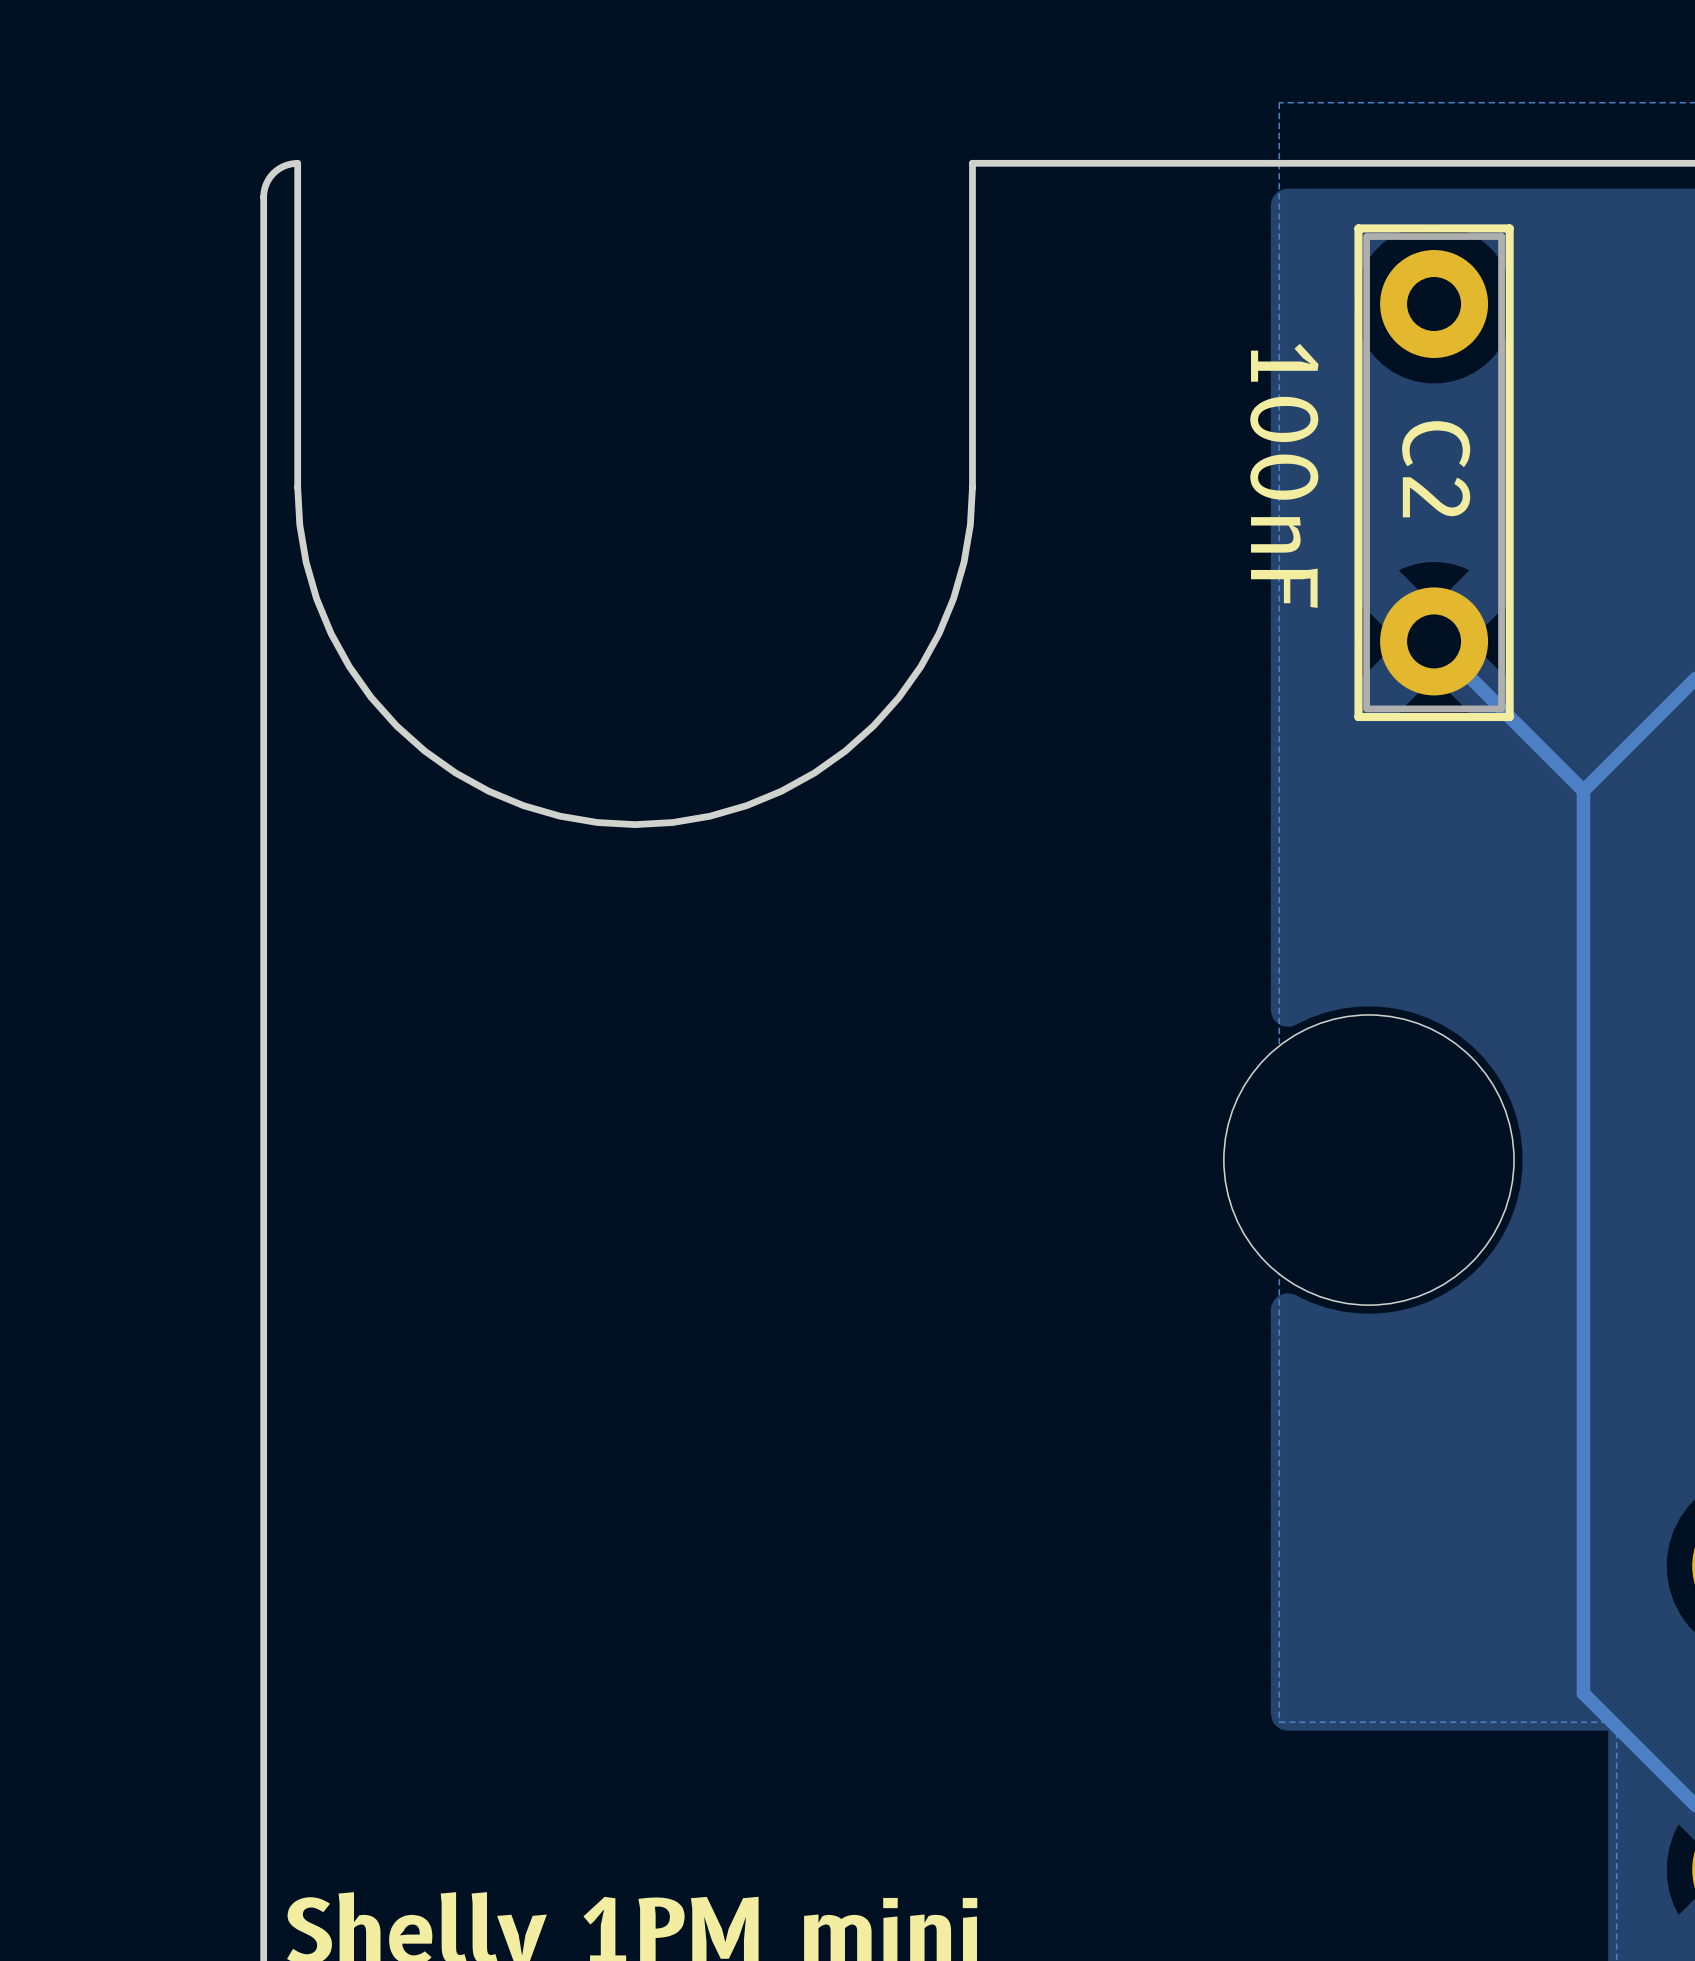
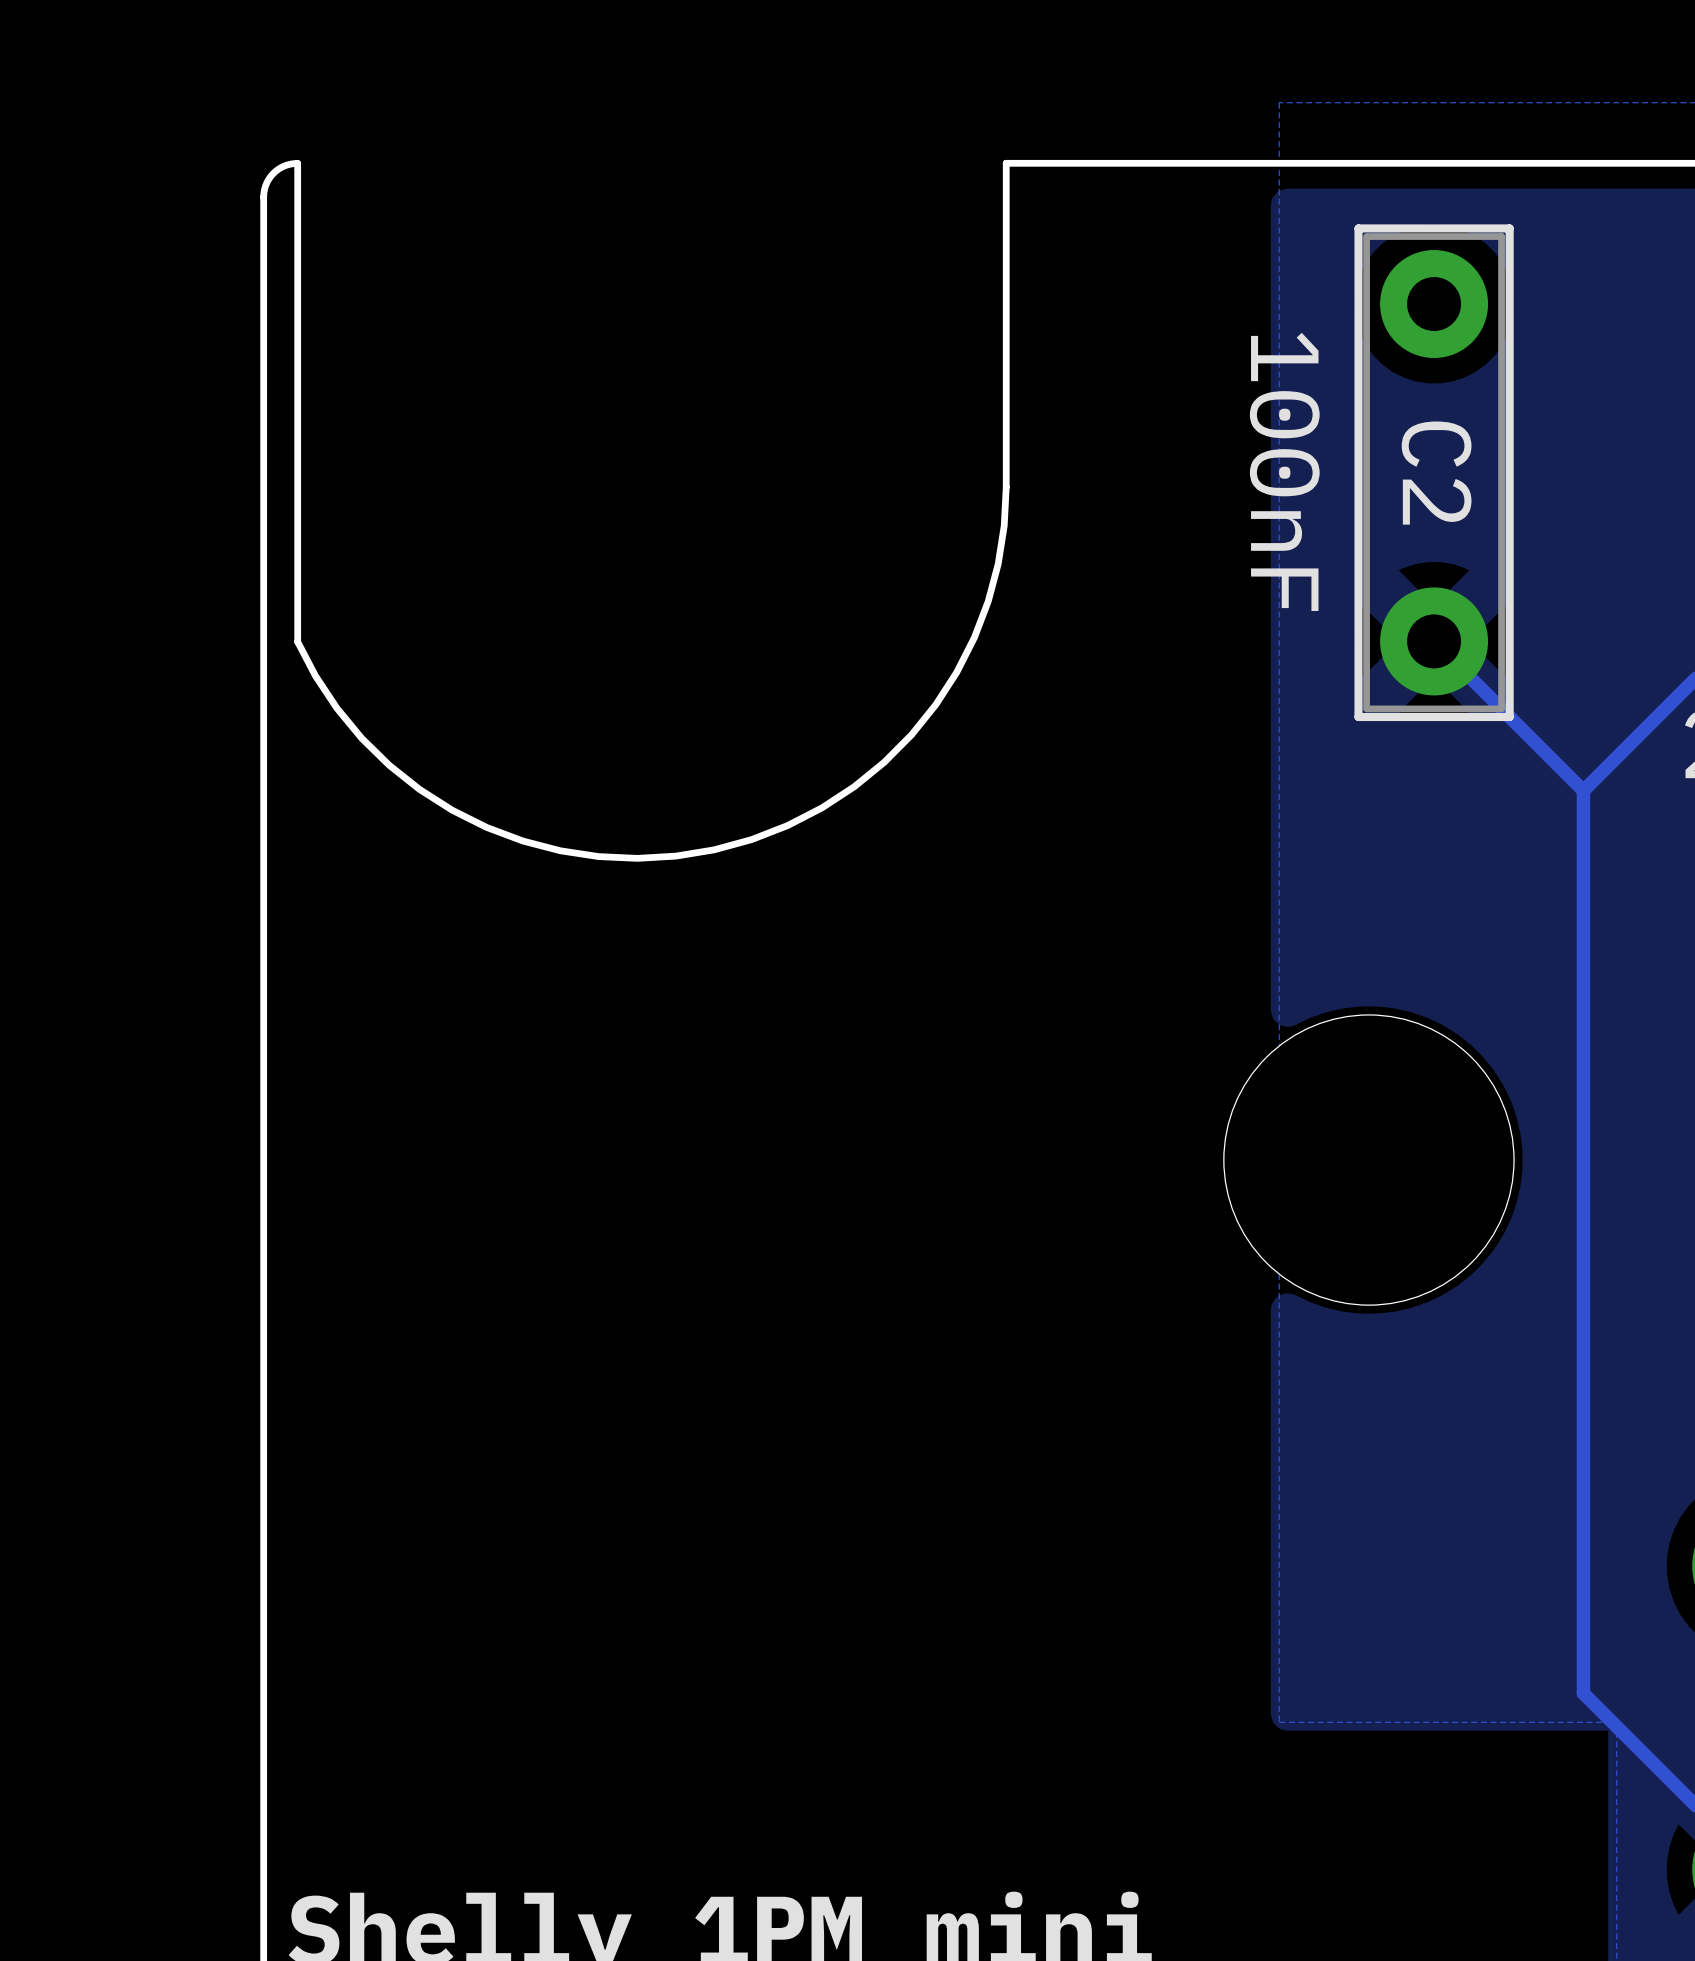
board edge: (1006, 163) (972, 163) (972, 487) (970, 525) (964, 562) (953, 598) (939, 633) (920, 666) (898, 697) (873, 725) (845, 751) (814, 772) (781, 791) (746, 805) (710, 816) (672, 822) (635, 824) (597, 822) (560, 816) (523, 805) (488, 791) (455, 772) (424, 751) (396, 725) (371, 697) (349, 666) (331, 633) (316, 598) (306, 562) (299, 525) (297, 487) -> (1006, 163) (1006, 487) (1004, 525) (998, 564) (988, 601) (974, 637) (956, 672) (935, 704) (911, 734) (884, 762) (854, 786) (821, 807) (787, 825) (751, 839) (714, 849) (676, 856) (637, 858) (598, 856) (560, 850) (523, 841) (486, 827) (452, 810) (419, 789) (389, 765) (361, 738) (337, 708) (315, 676) (297, 641) (297, 487)

